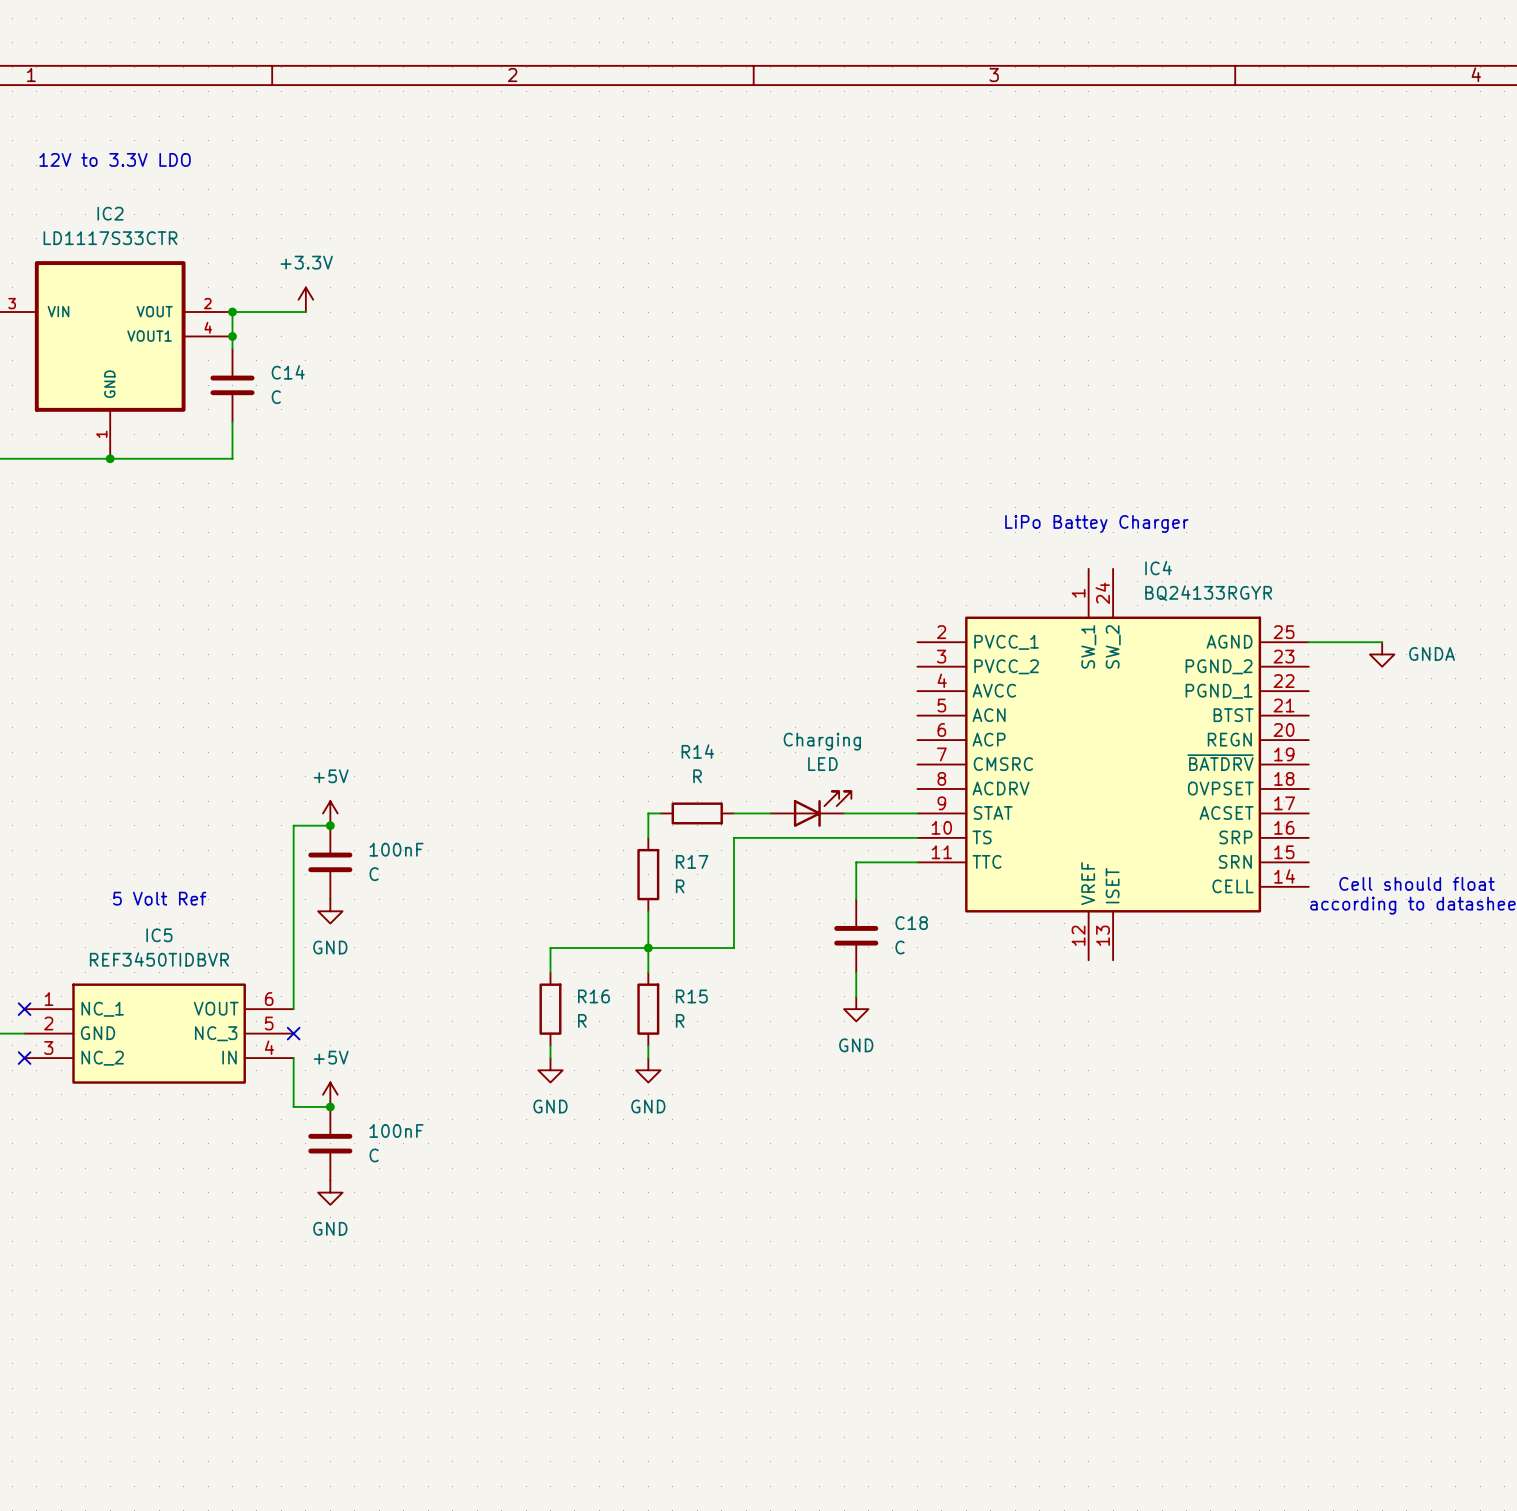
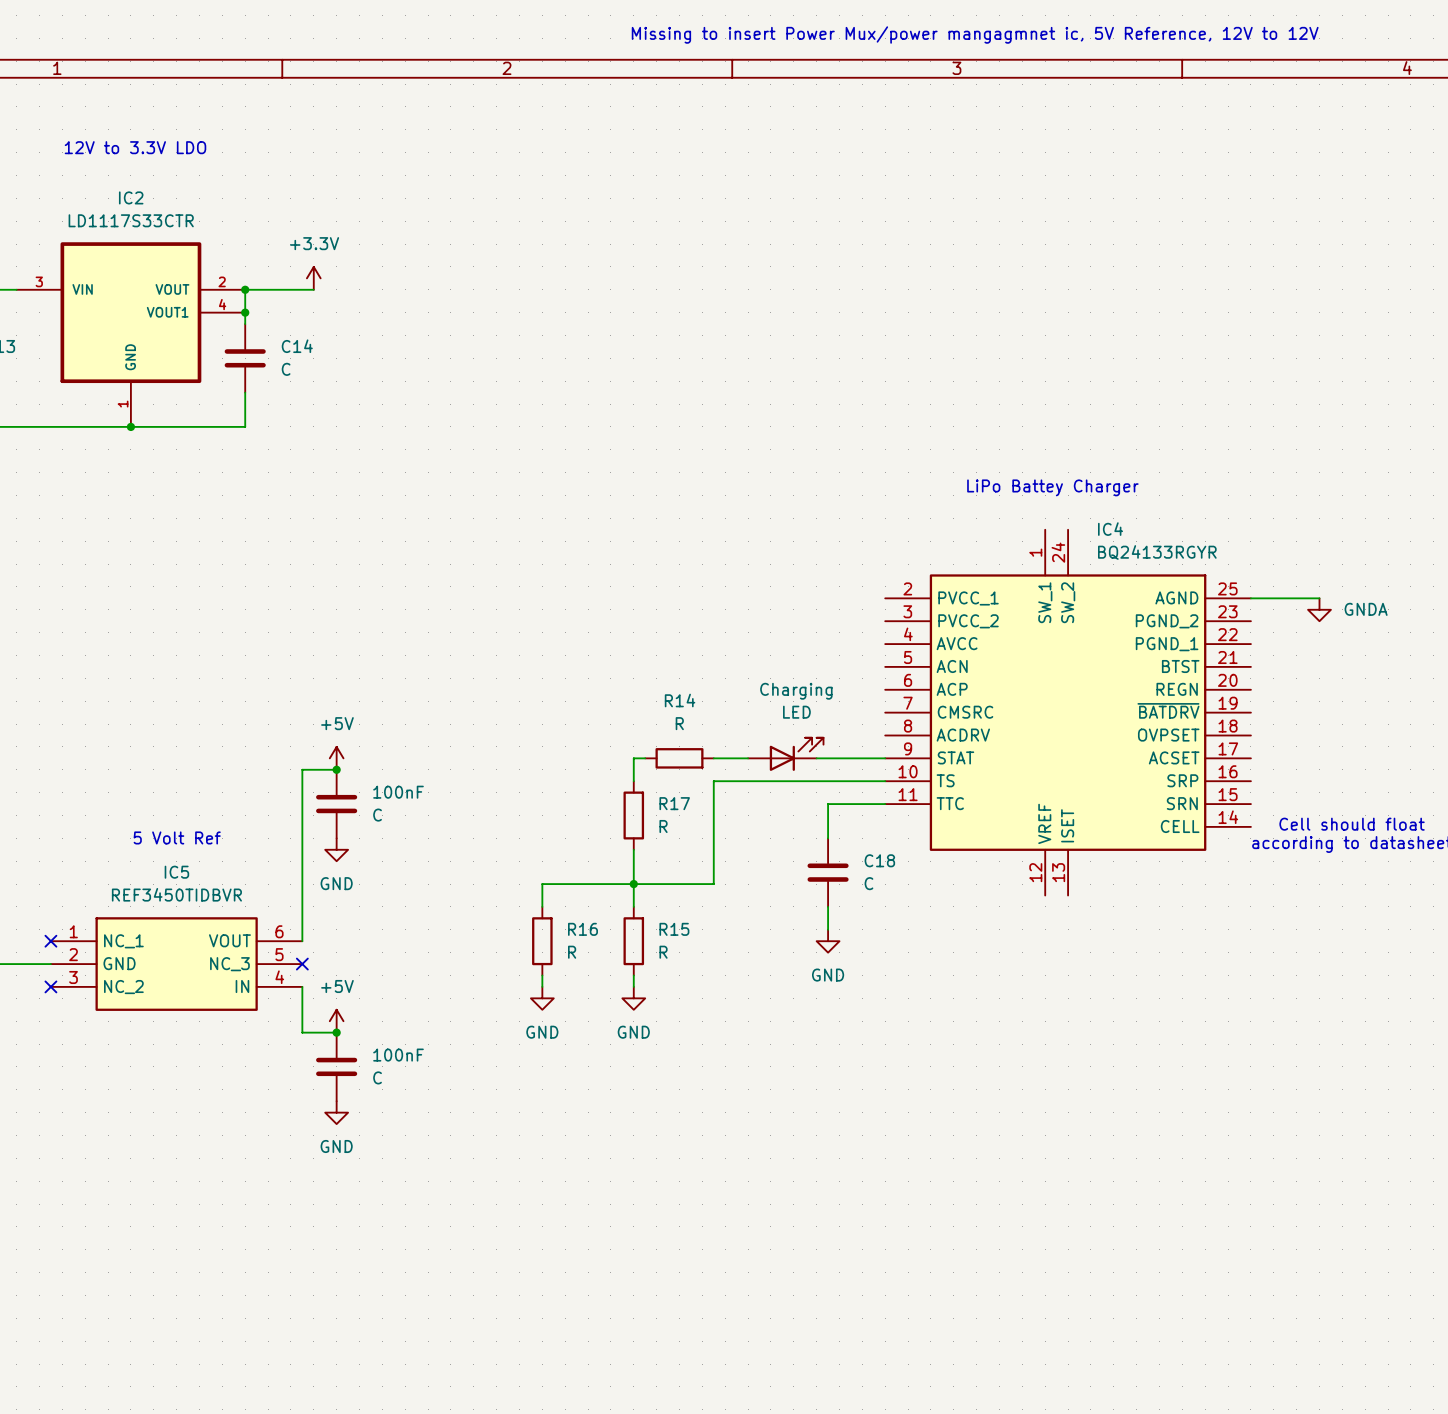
text: none -> Missing to insert Power Mux/power mangagmnet ic, 5V Reference, 12V to 12V (975, 35)

